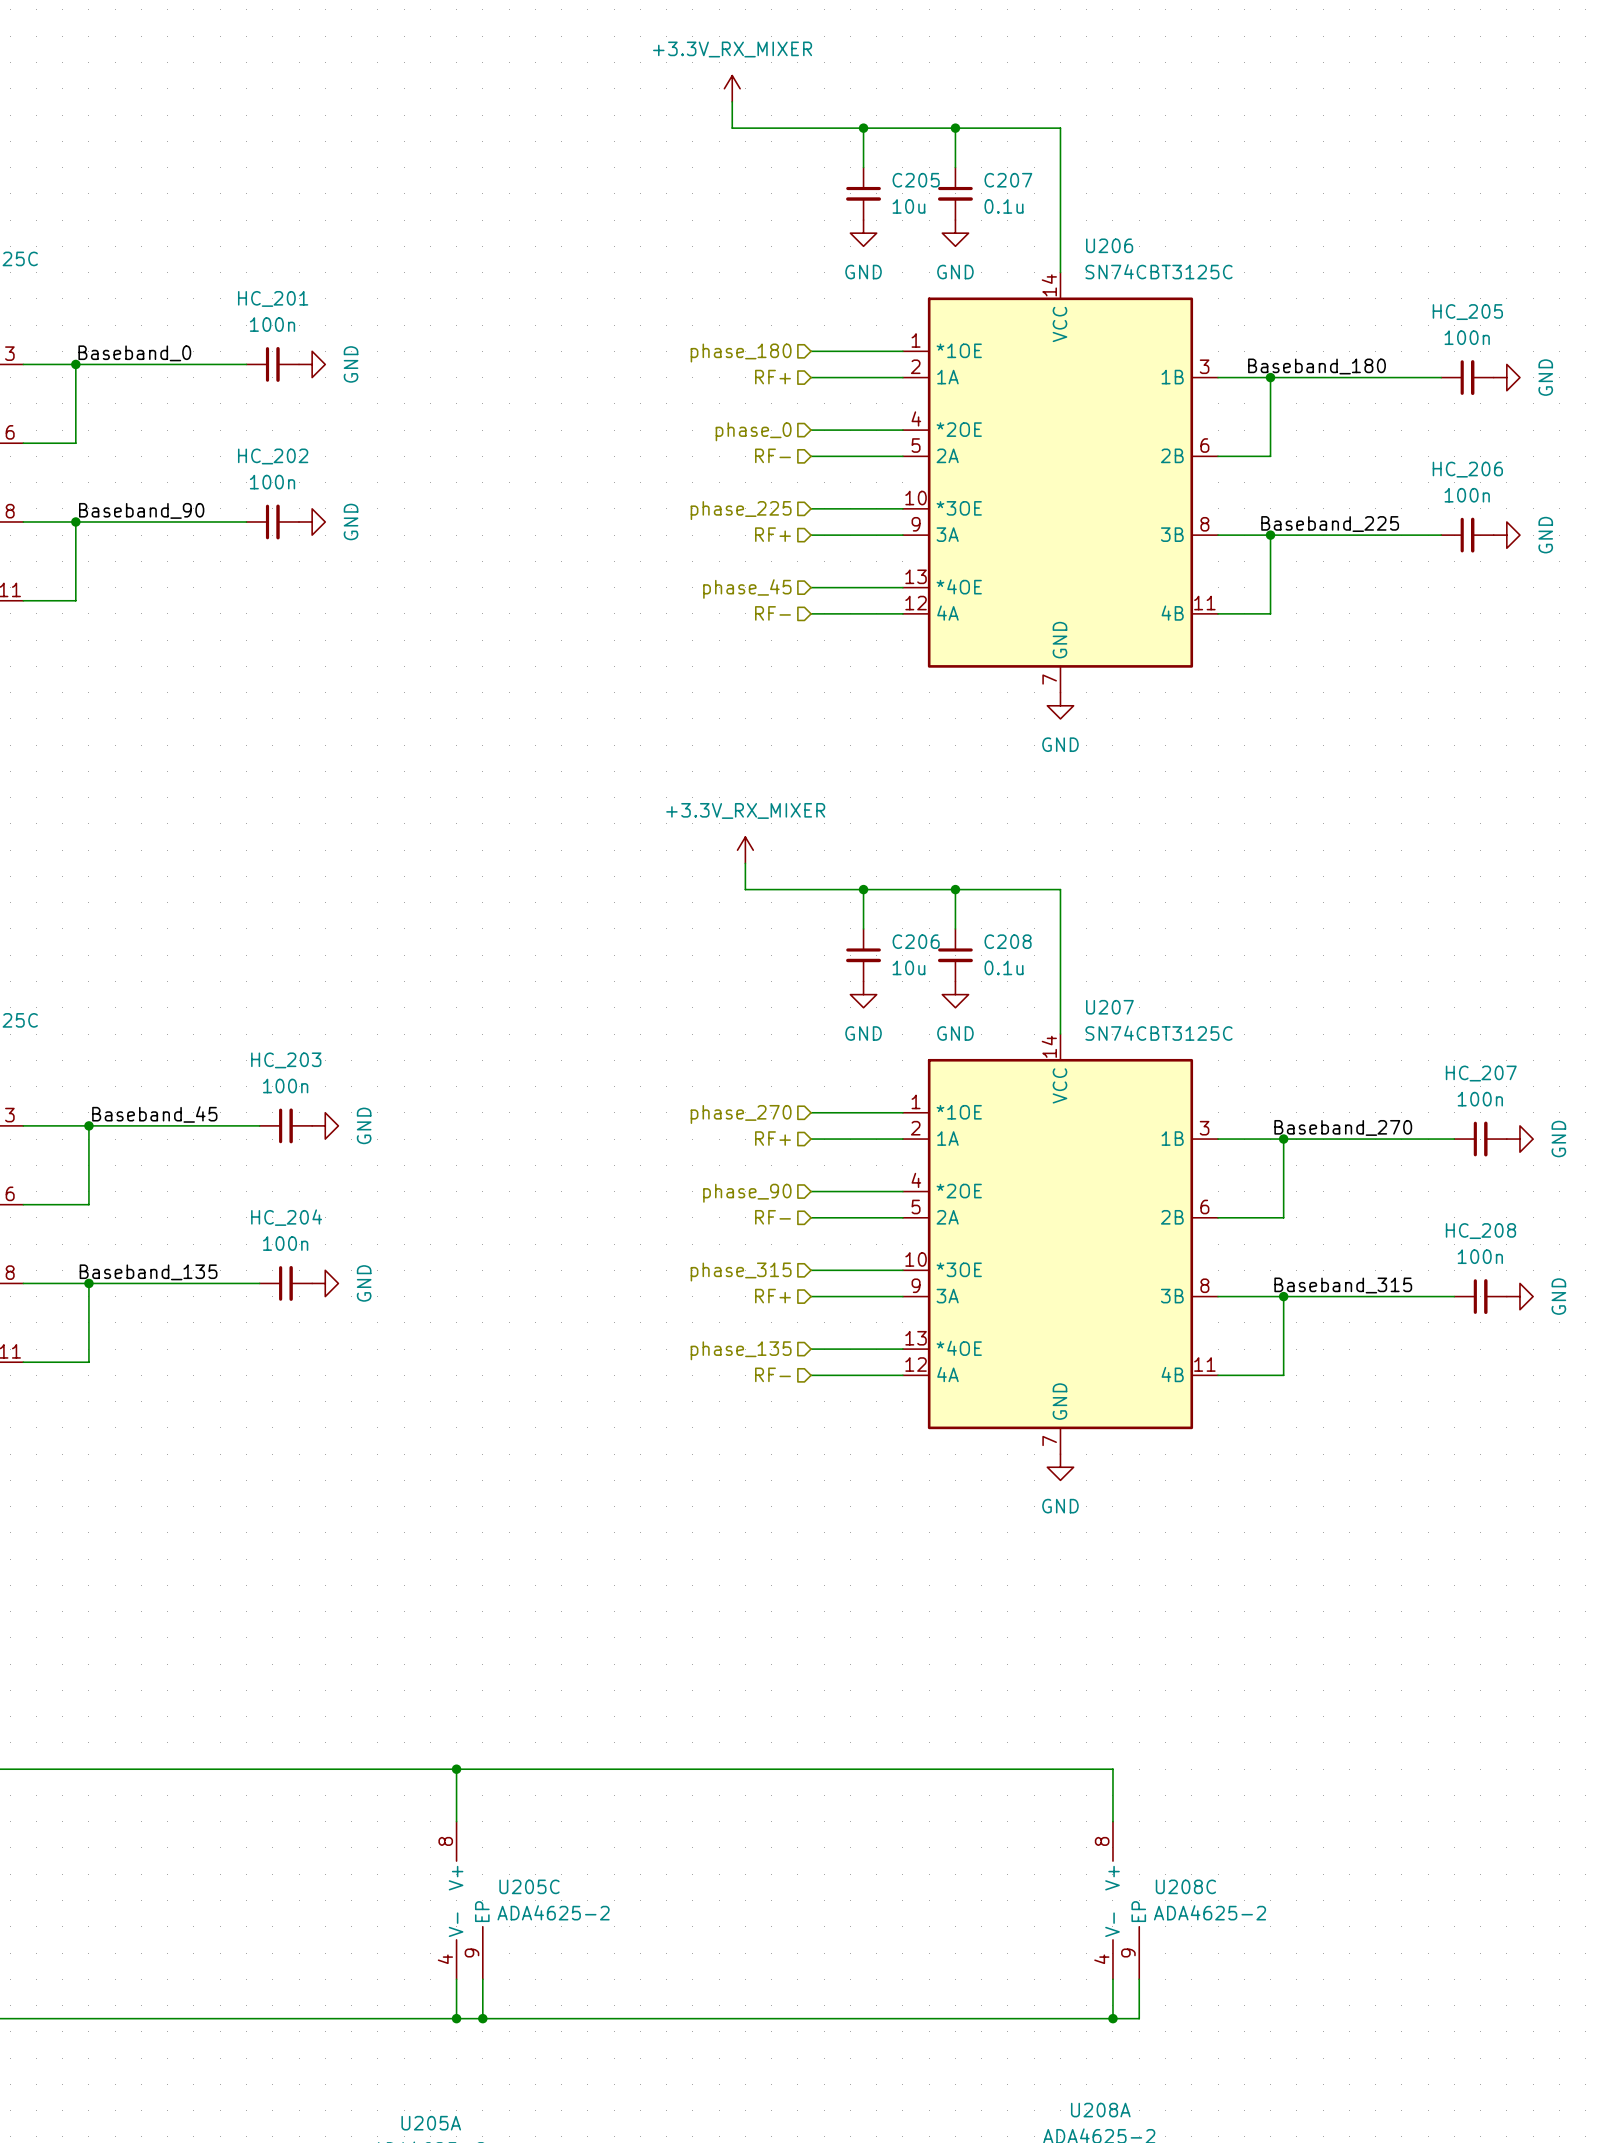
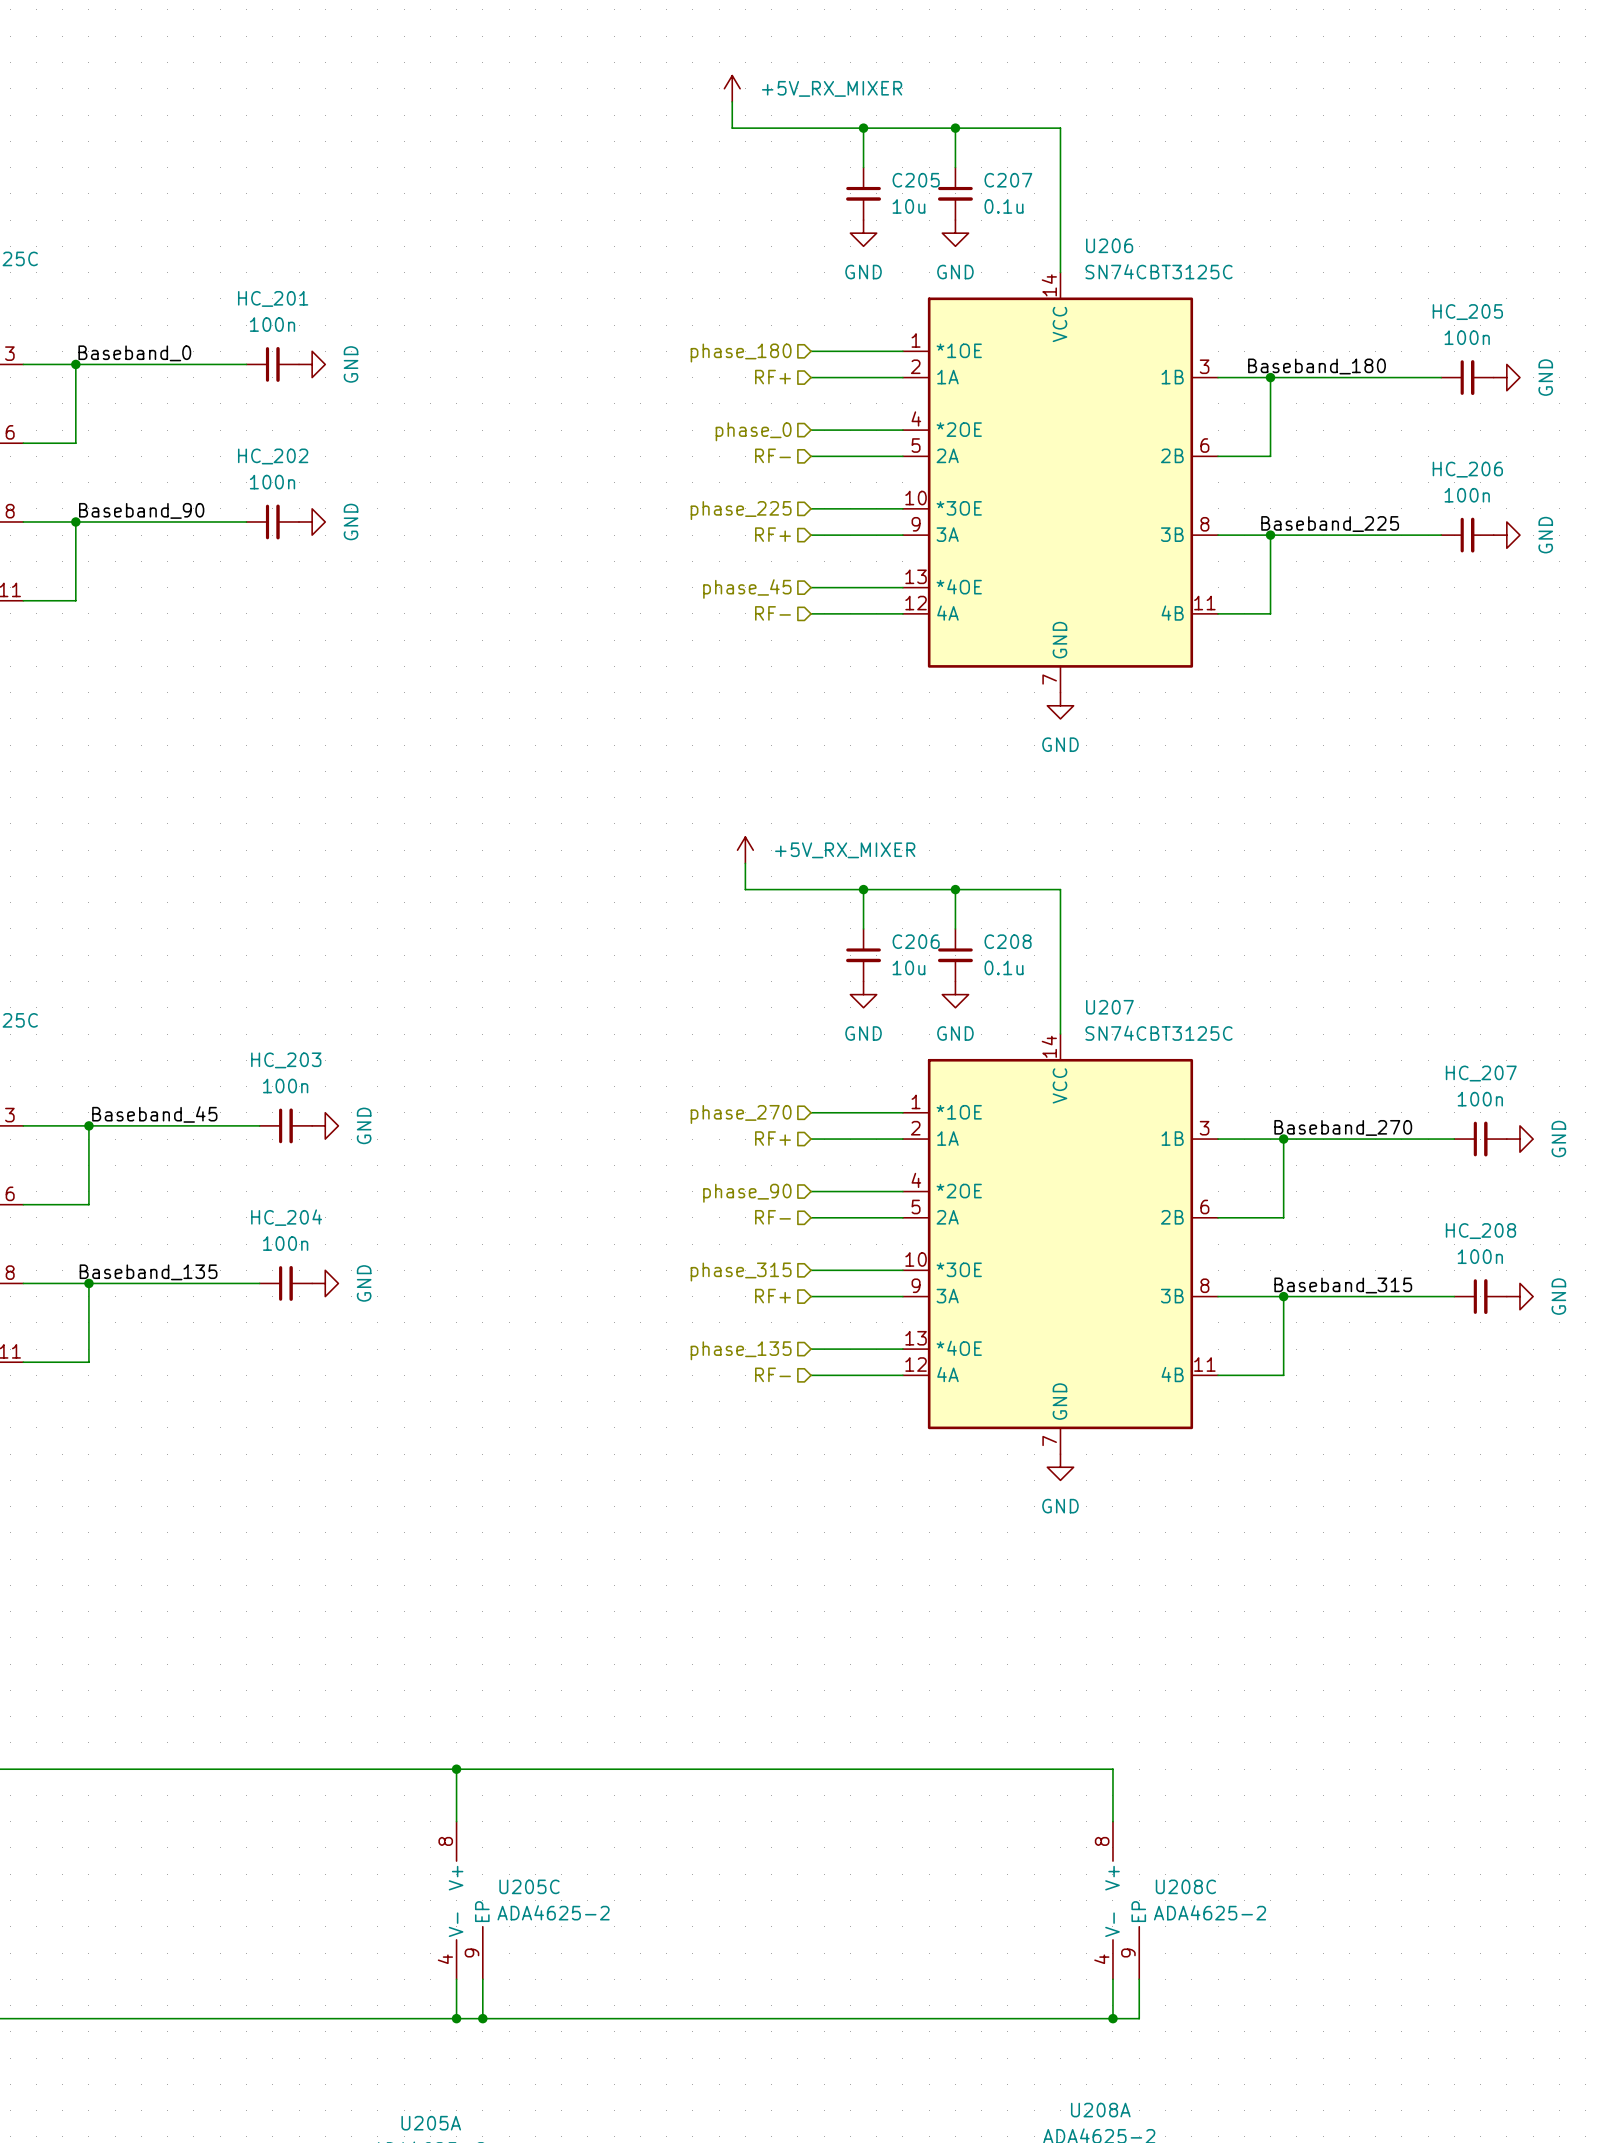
power symbol: +3.3V_RX_MIXER (732, 88) -> +5V_RX_MIXER (732, 88)
power symbol: +3.3V_RX_MIXER (745, 850) -> +5V_RX_MIXER (745, 850)

